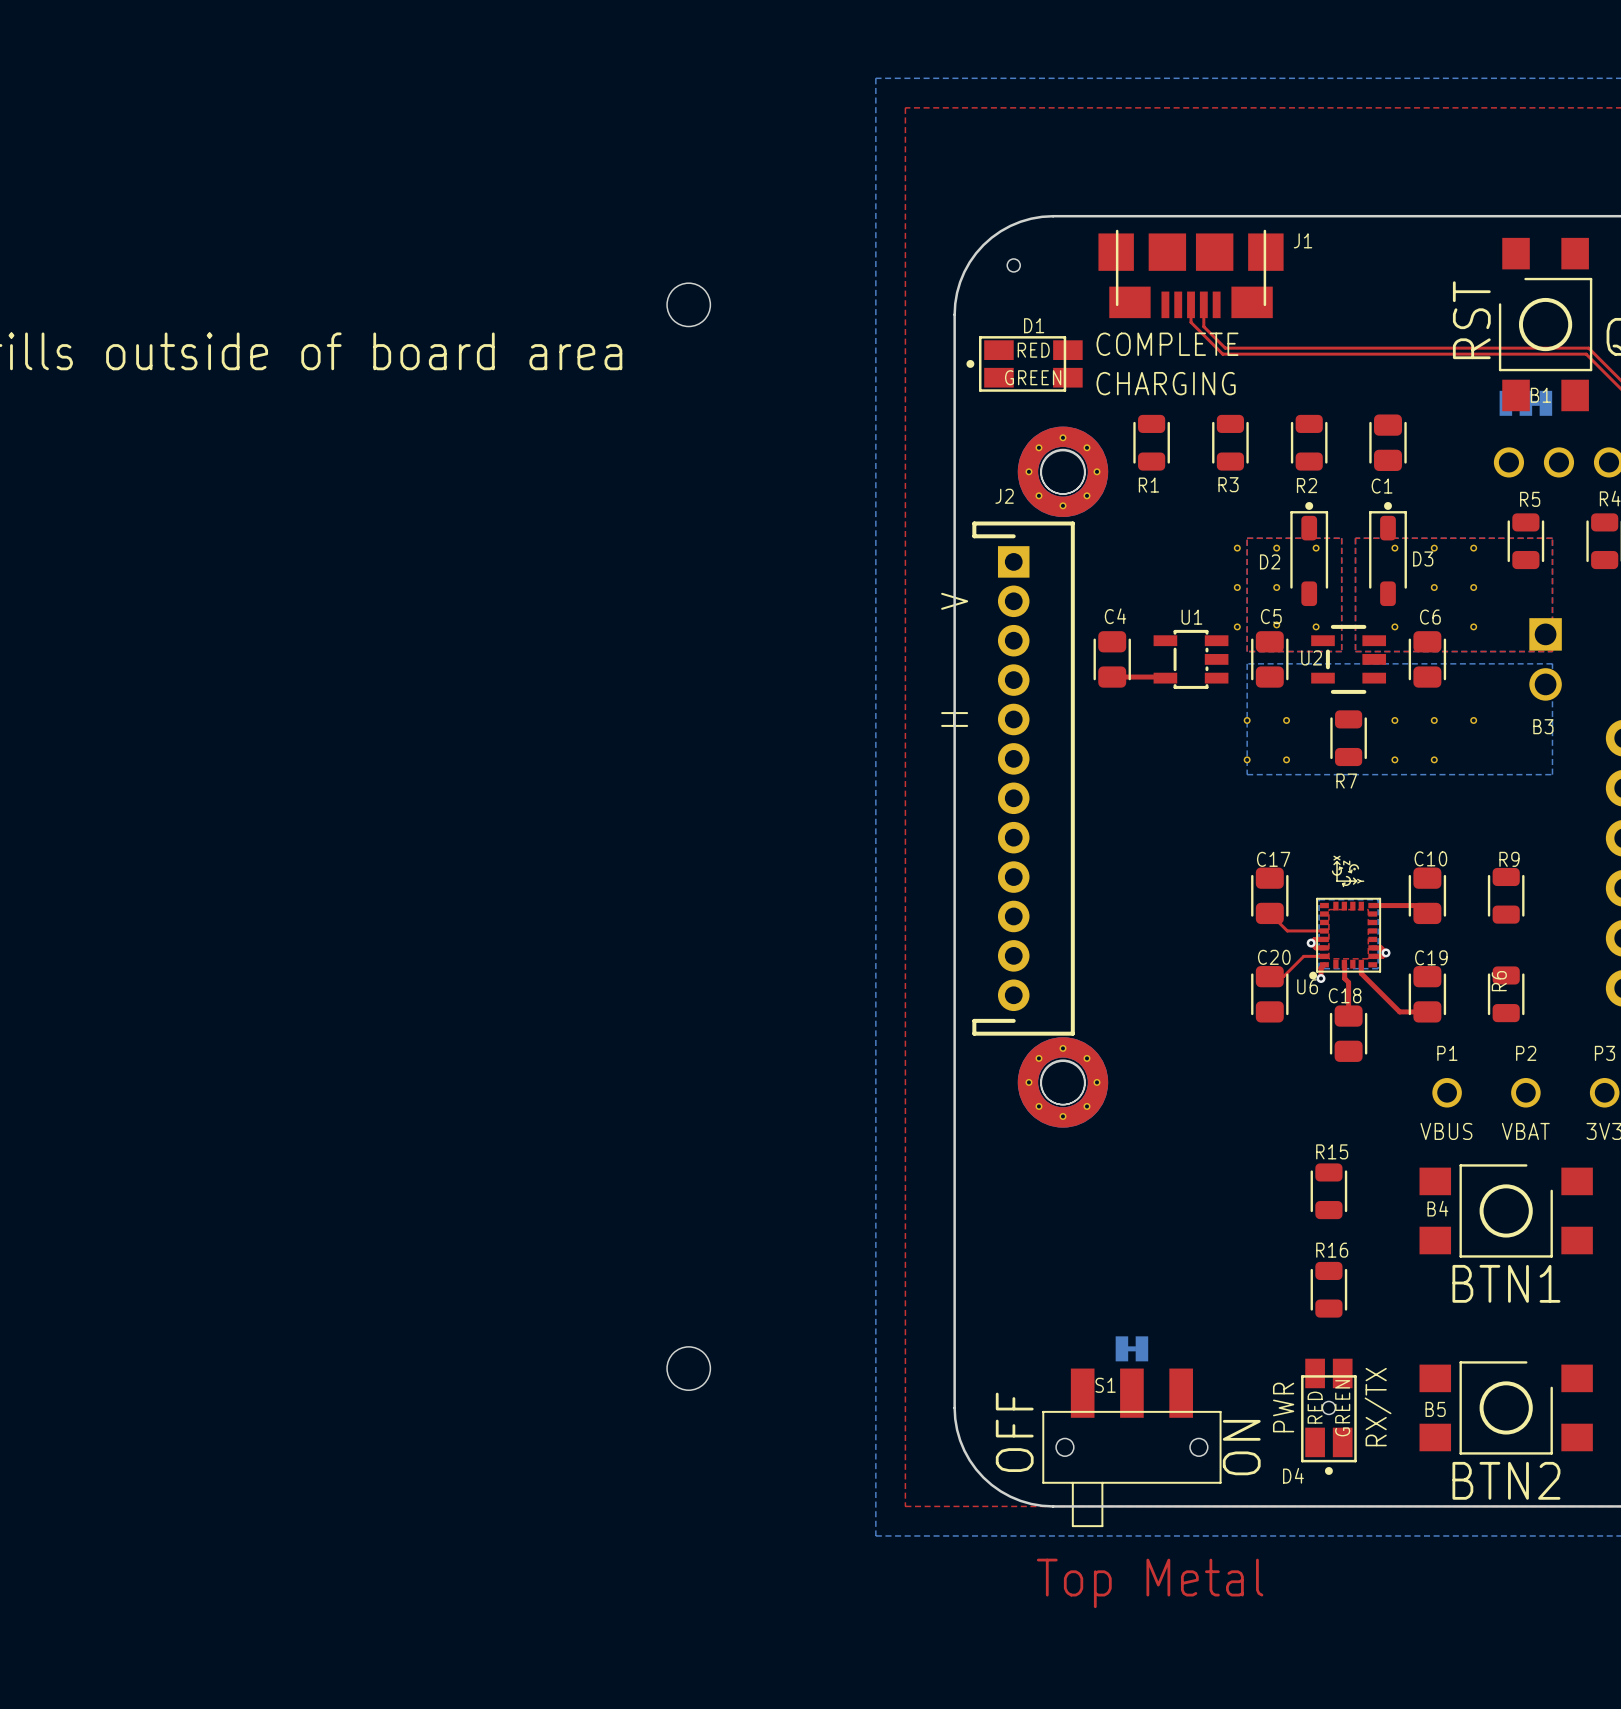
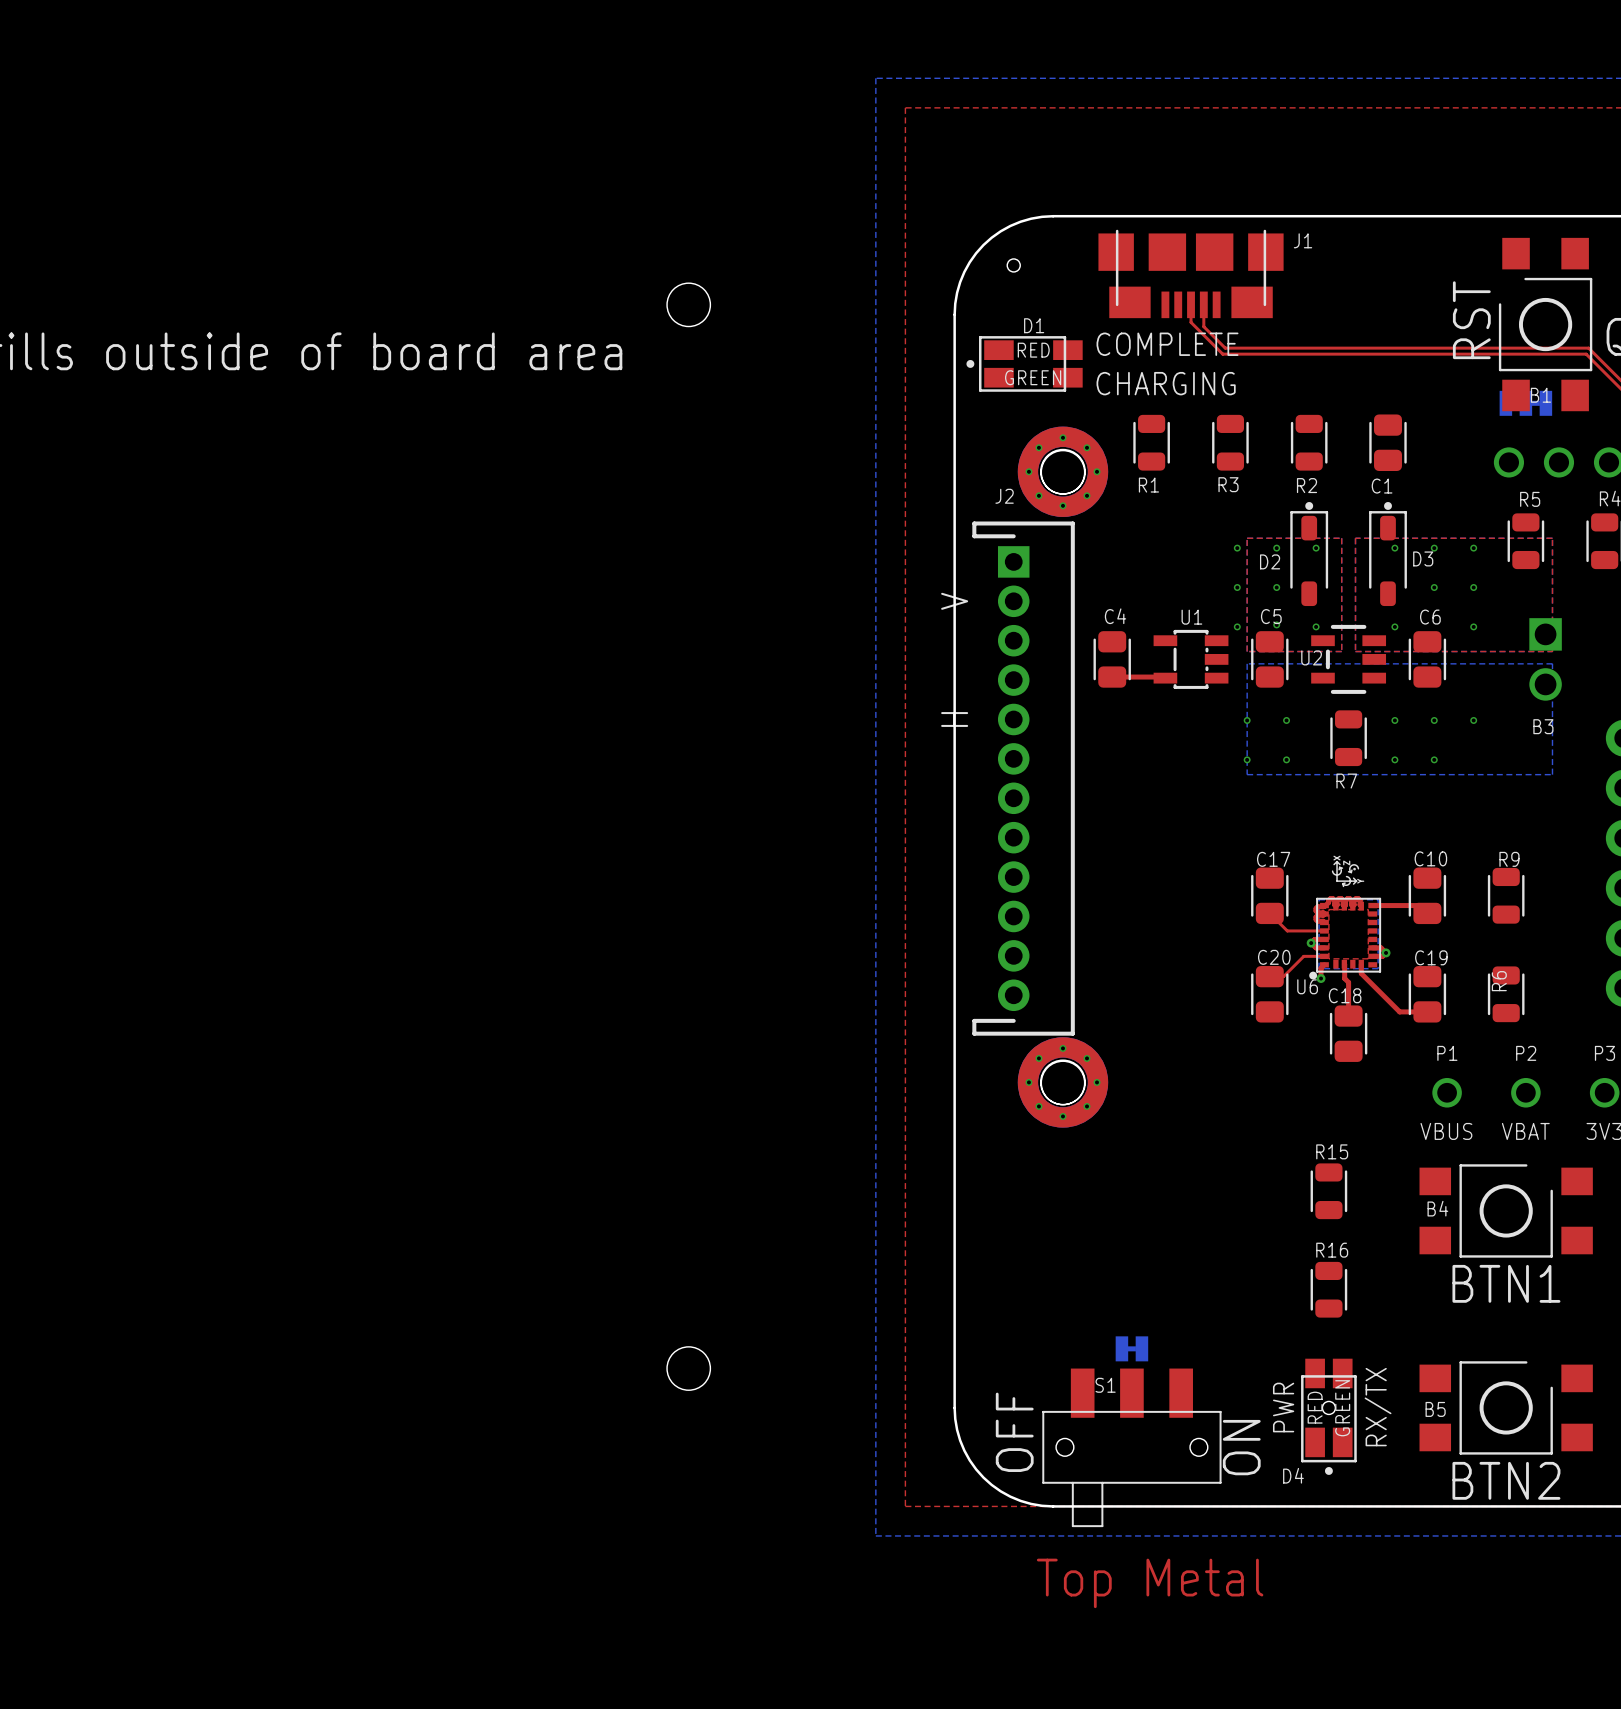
top track: none -> (1361, 906) (1358, 898) (1354, 900) (1352, 906) (1349, 898) (1345, 900) (1344, 906) (1341, 898) (1337, 900) (1335, 906) (1334, 900) (1330, 898) (1325, 906) (1316, 908) (1317, 912) (1324, 914) (1317, 915) (1316, 919) (1324, 922)

